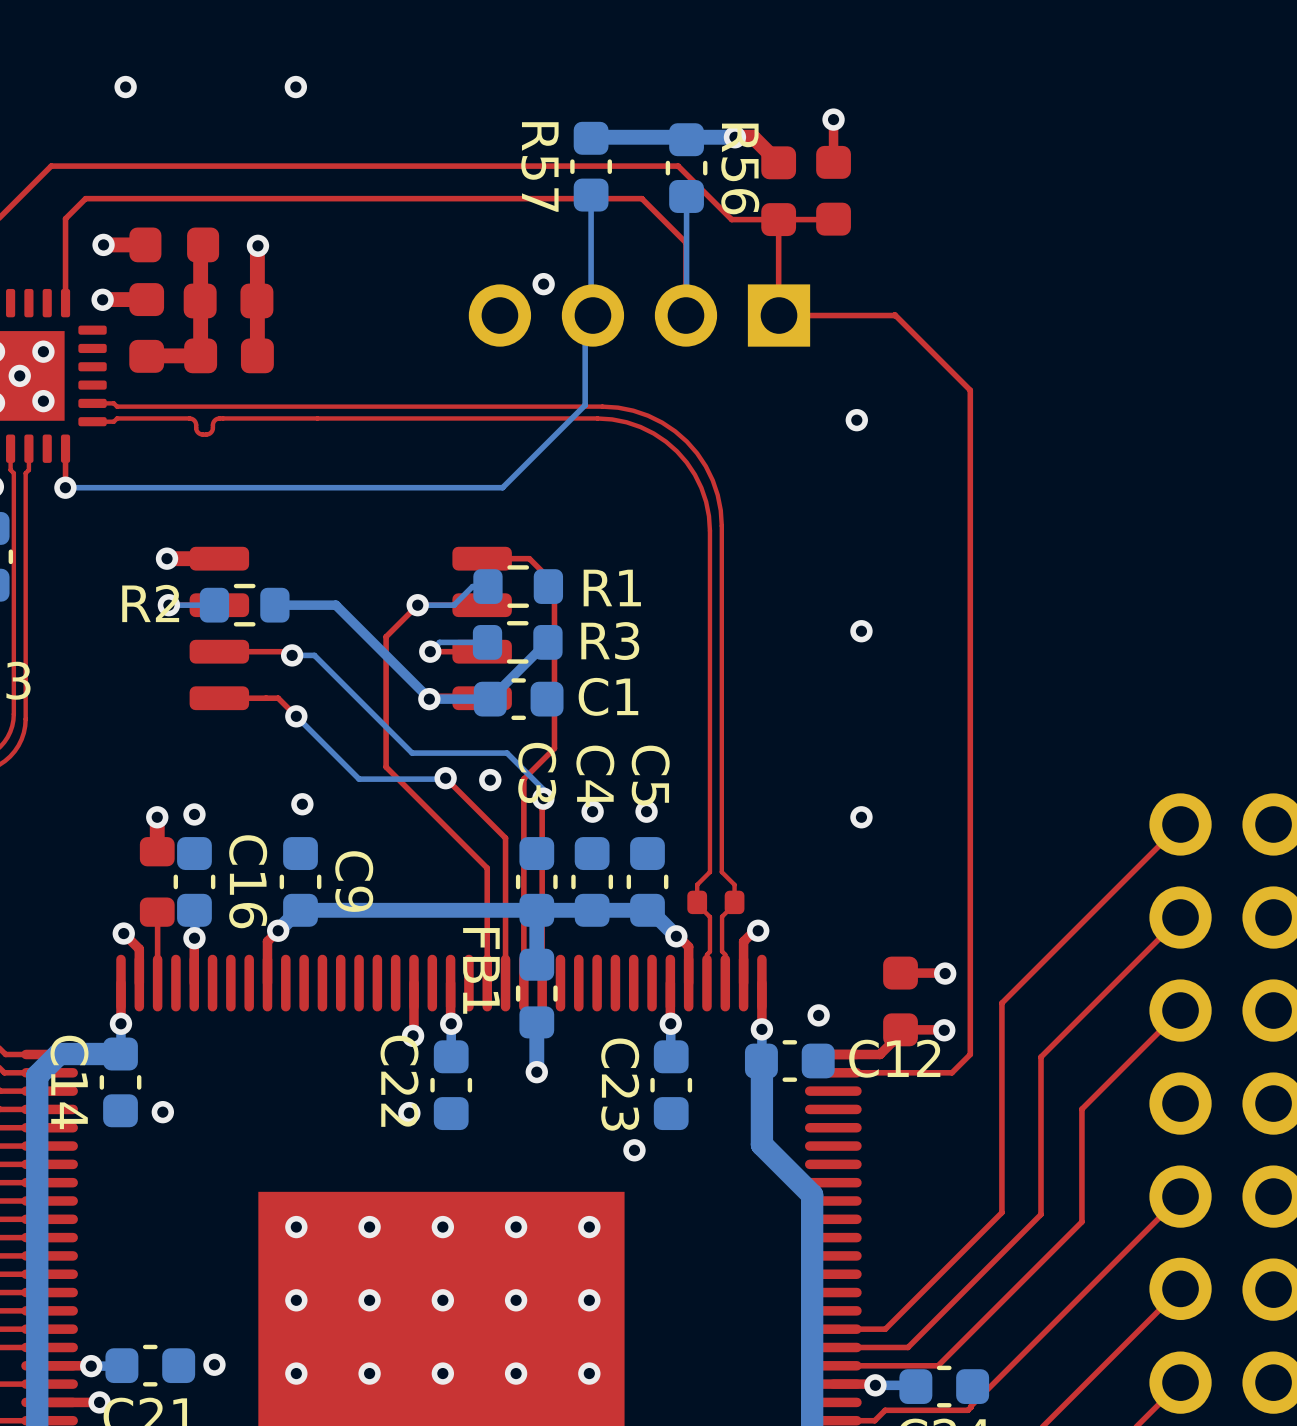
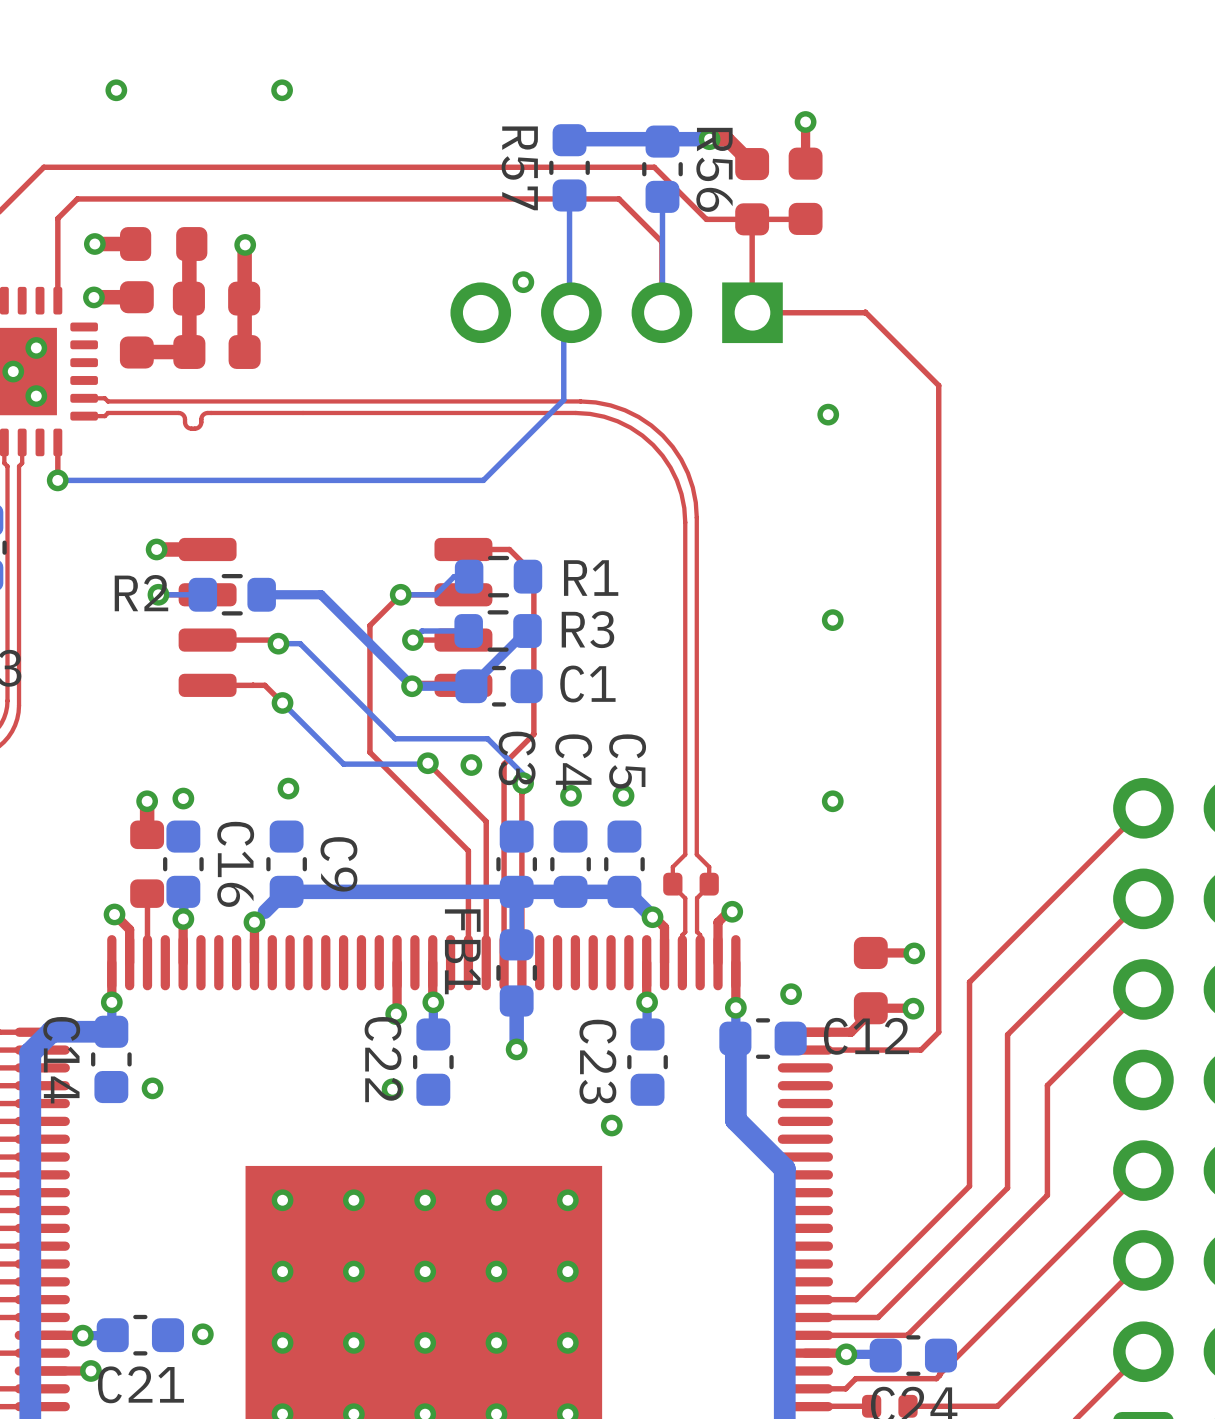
via position: (278, 930) -> (254, 922)

